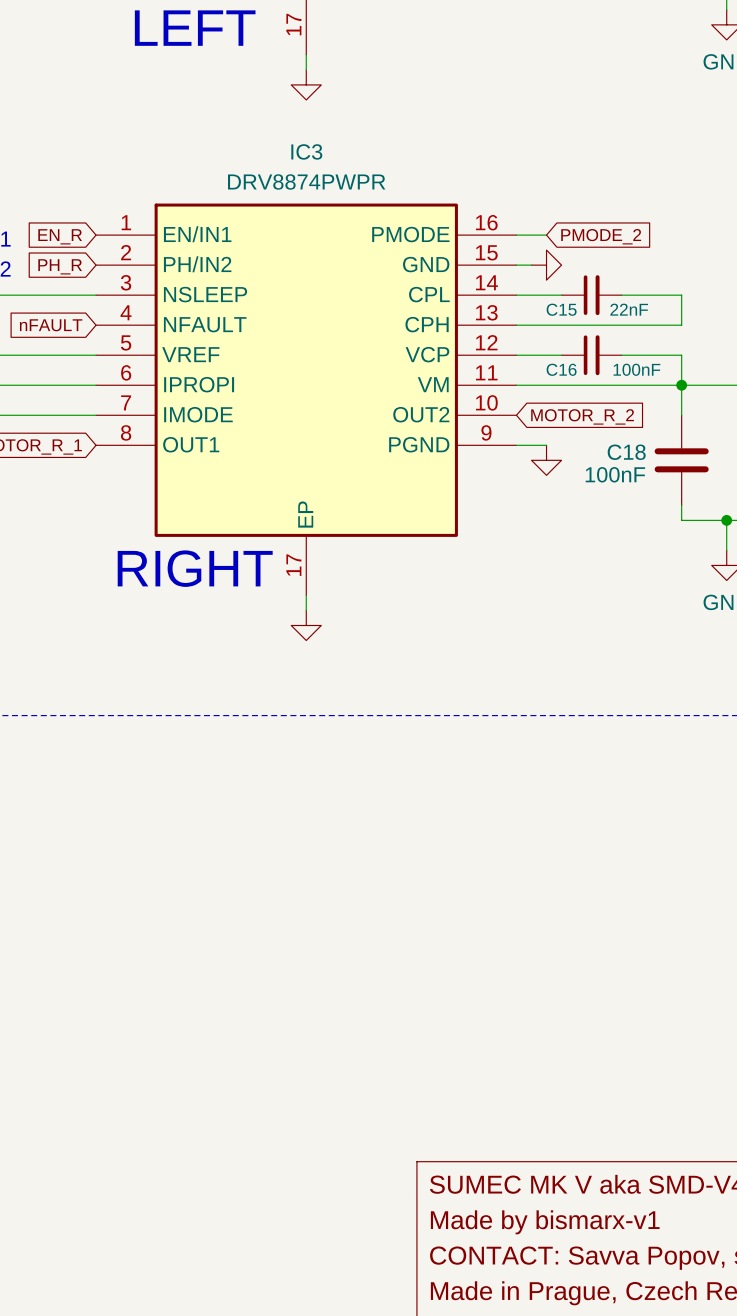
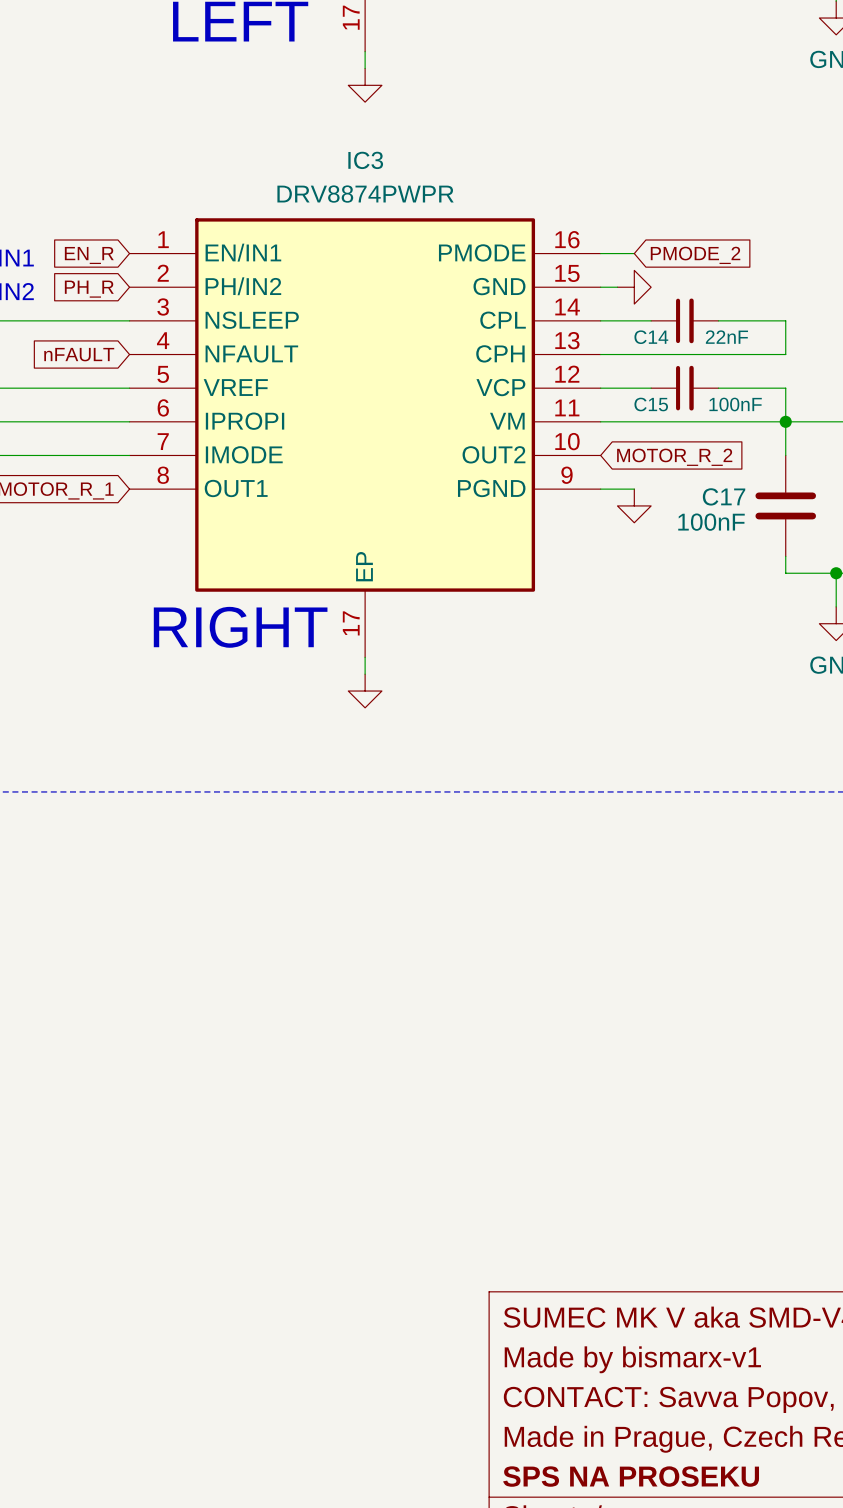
C15 name: C15 (561, 309) -> C14 (651, 337)
C16 name: C16 (561, 369) -> C15 (651, 404)
C18 name: C18 (626, 452) -> C17 (724, 496)

